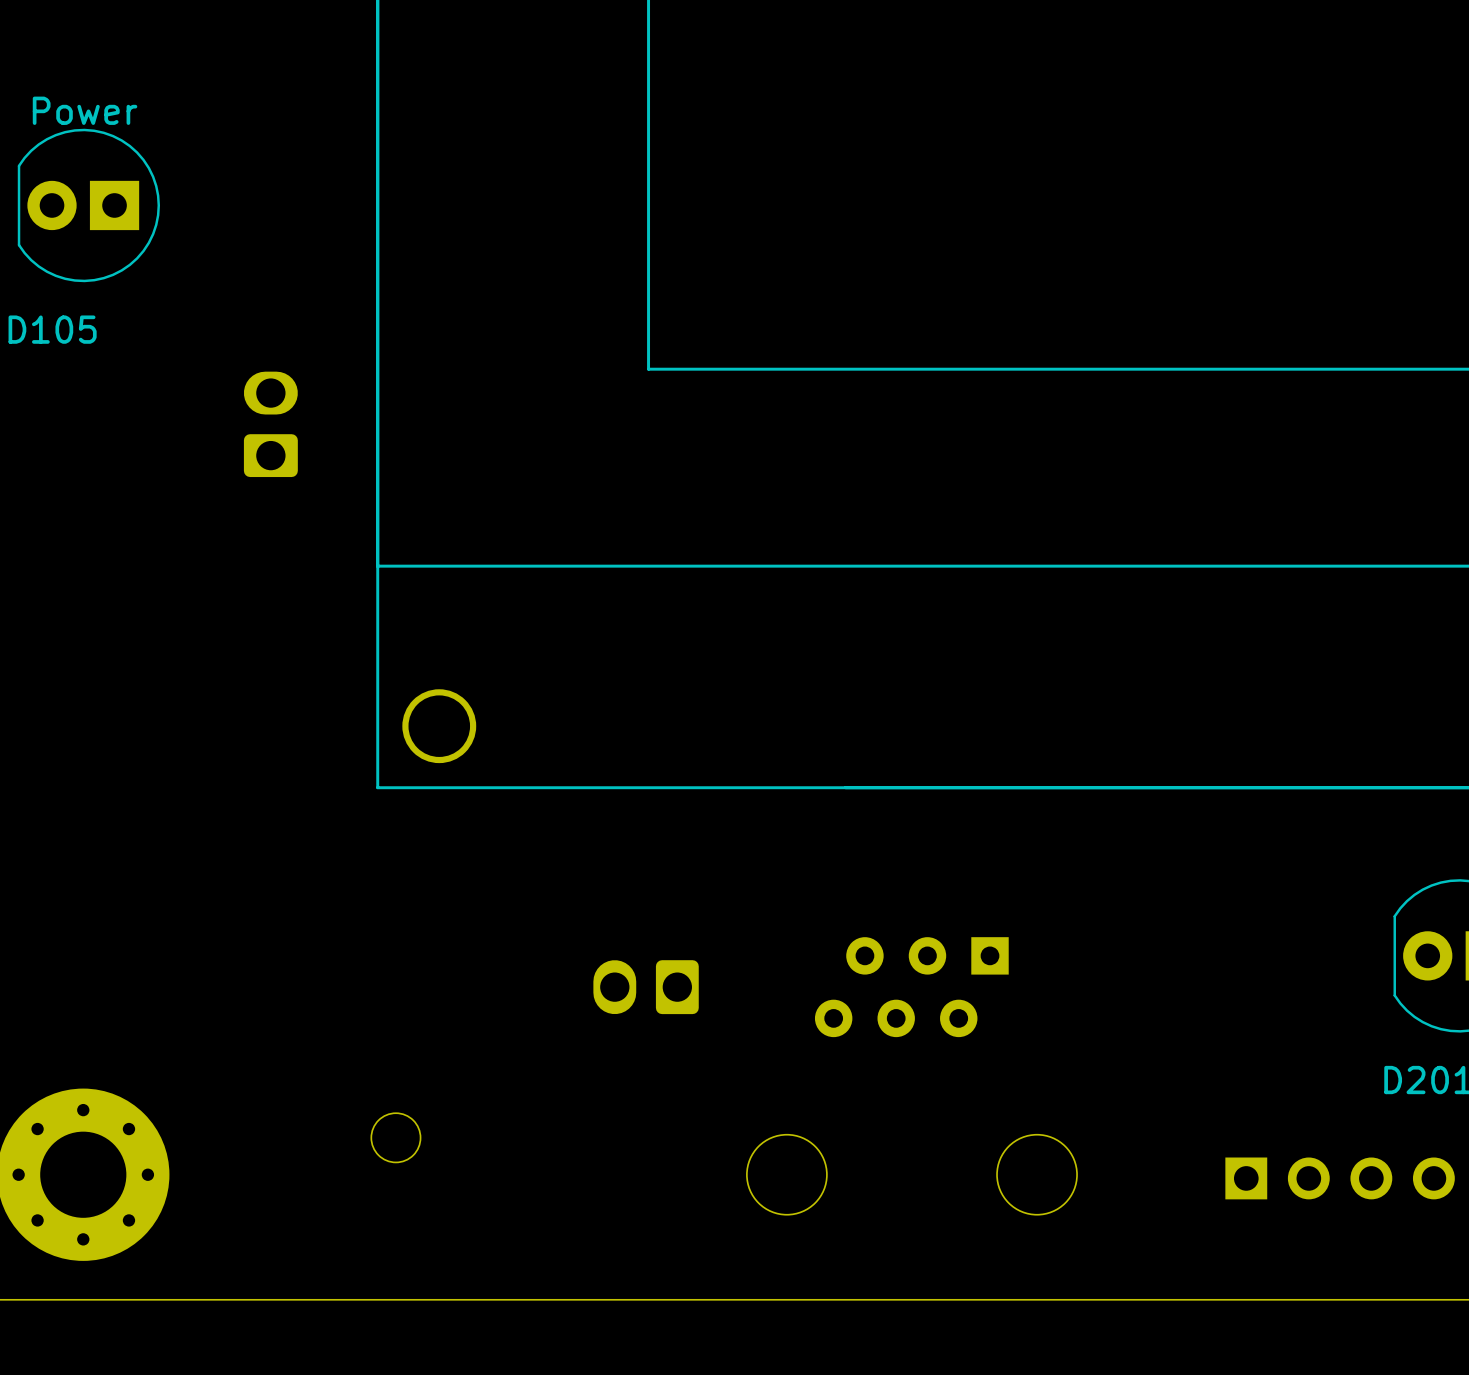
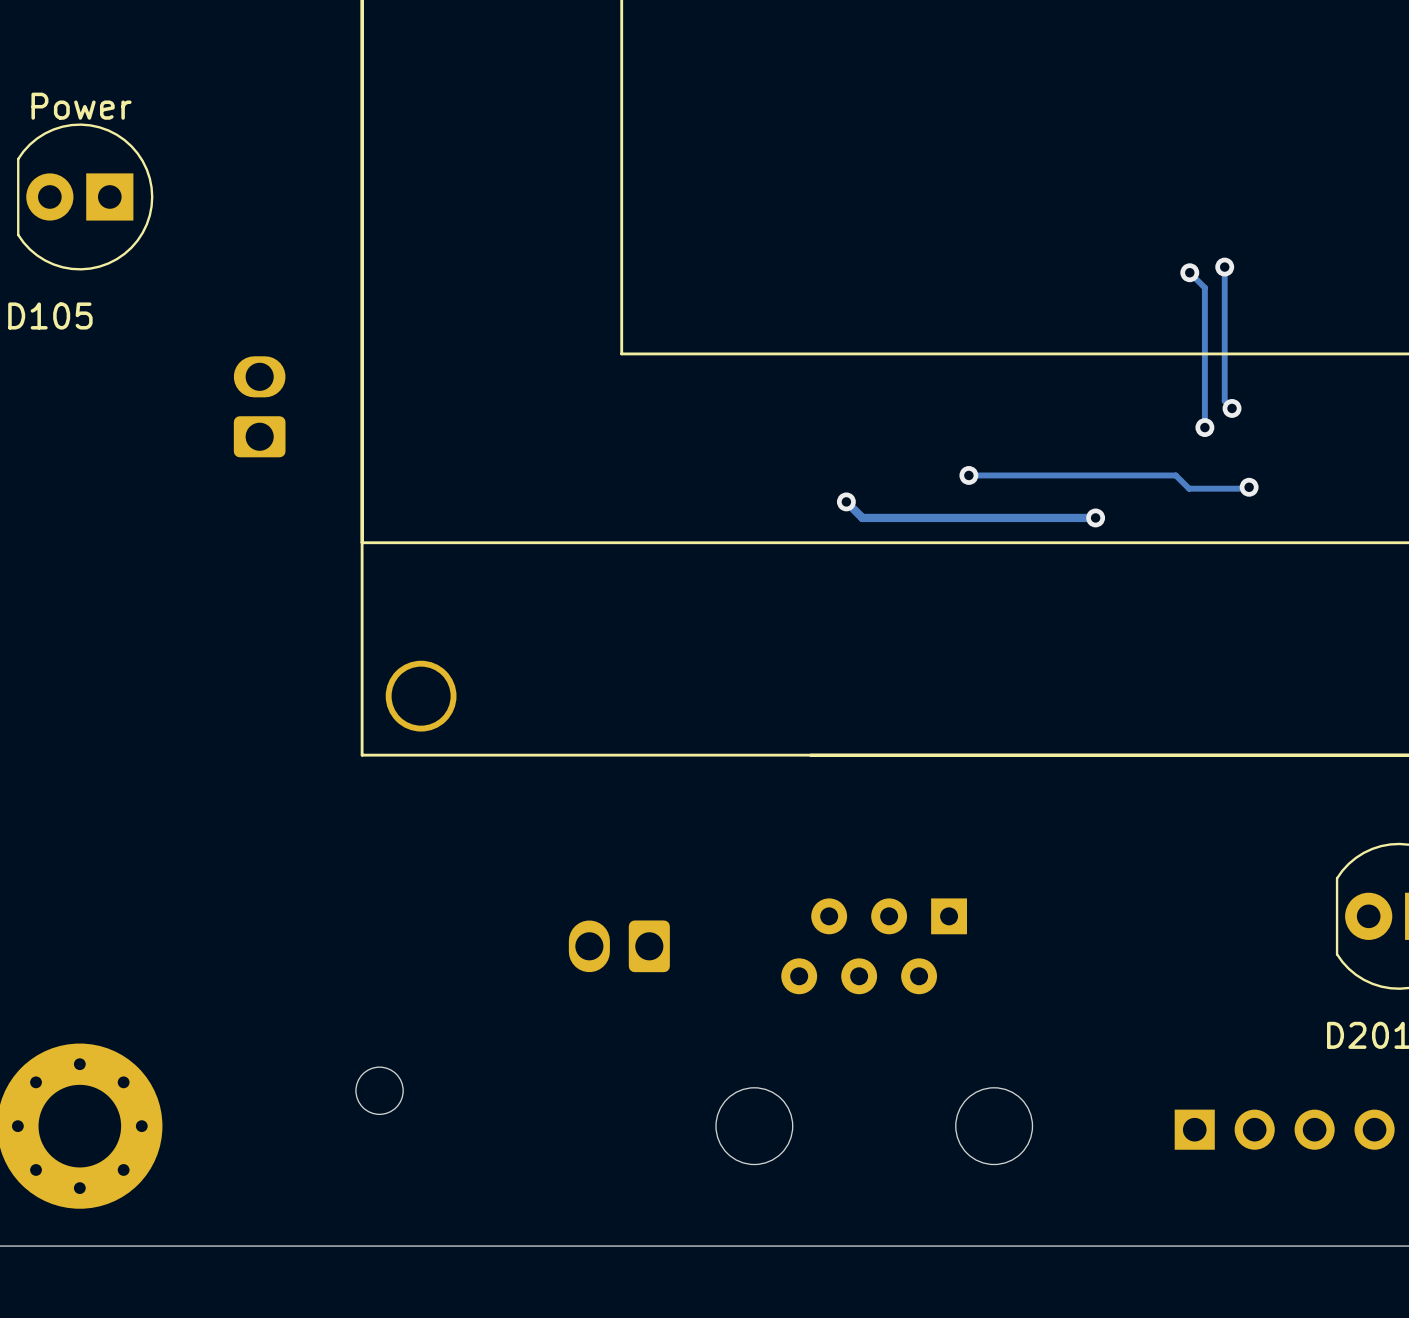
track: none -> (1224, 267) (1224, 401) (1232, 408)
via: none -> (1224, 267)
track: none -> (1189, 272) (1204, 287) (1204, 427)
via: none -> (1189, 272)
via: none -> (1232, 408)
via: none -> (1204, 427)
track: none -> (968, 475) (1175, 475) (1189, 488) (1249, 487)
via: none -> (968, 475)
via: none -> (1249, 487)
track: none -> (846, 501) (862, 517) (1095, 517)
via: none -> (846, 501)
via: none -> (1095, 517)

